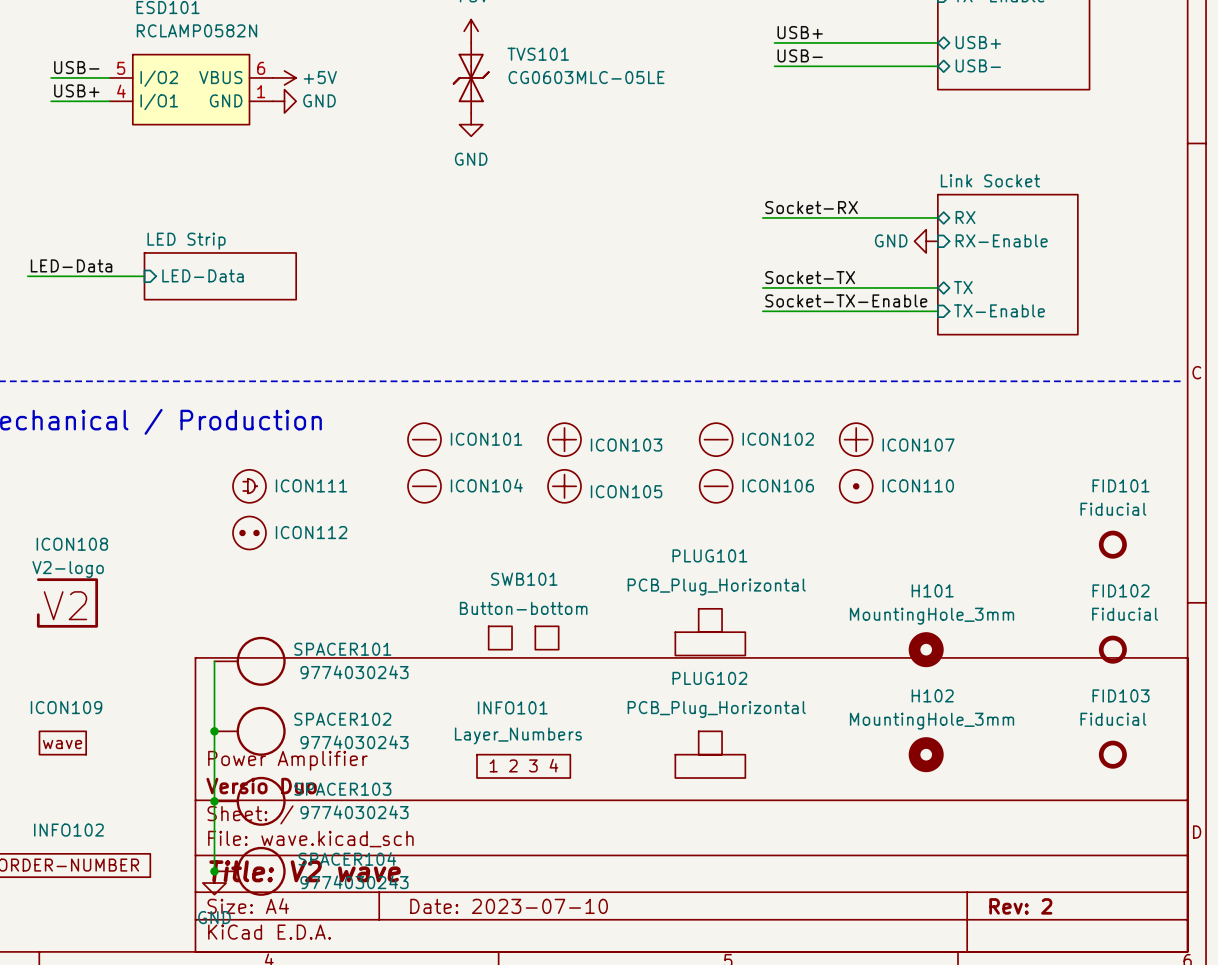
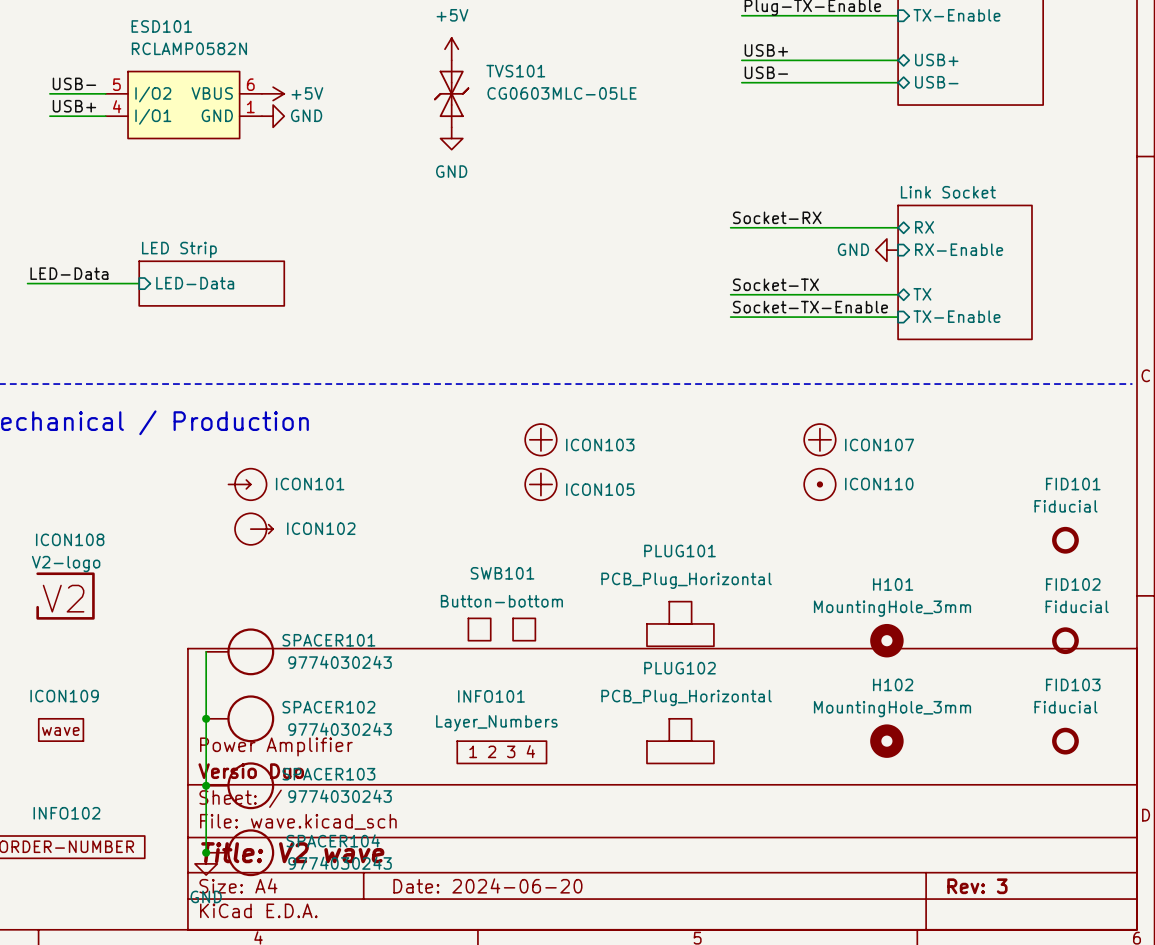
ICON101 symbol: [408, 423, 442, 457] -> [228, 468, 267, 501]
ICON102 symbol: [699, 423, 733, 457] -> [235, 513, 274, 545]
ICON111: (249, 486) -> none
ICON104: (424, 486) -> none
ICON106: (716, 486) -> none
ICON112: (249, 532) -> none
title block: Date: 2023-07-10 (509, 906) -> Date: 2024-06-20 (487, 885)
title block: Rev: 2 (1020, 906) -> Rev: 3 (977, 886)

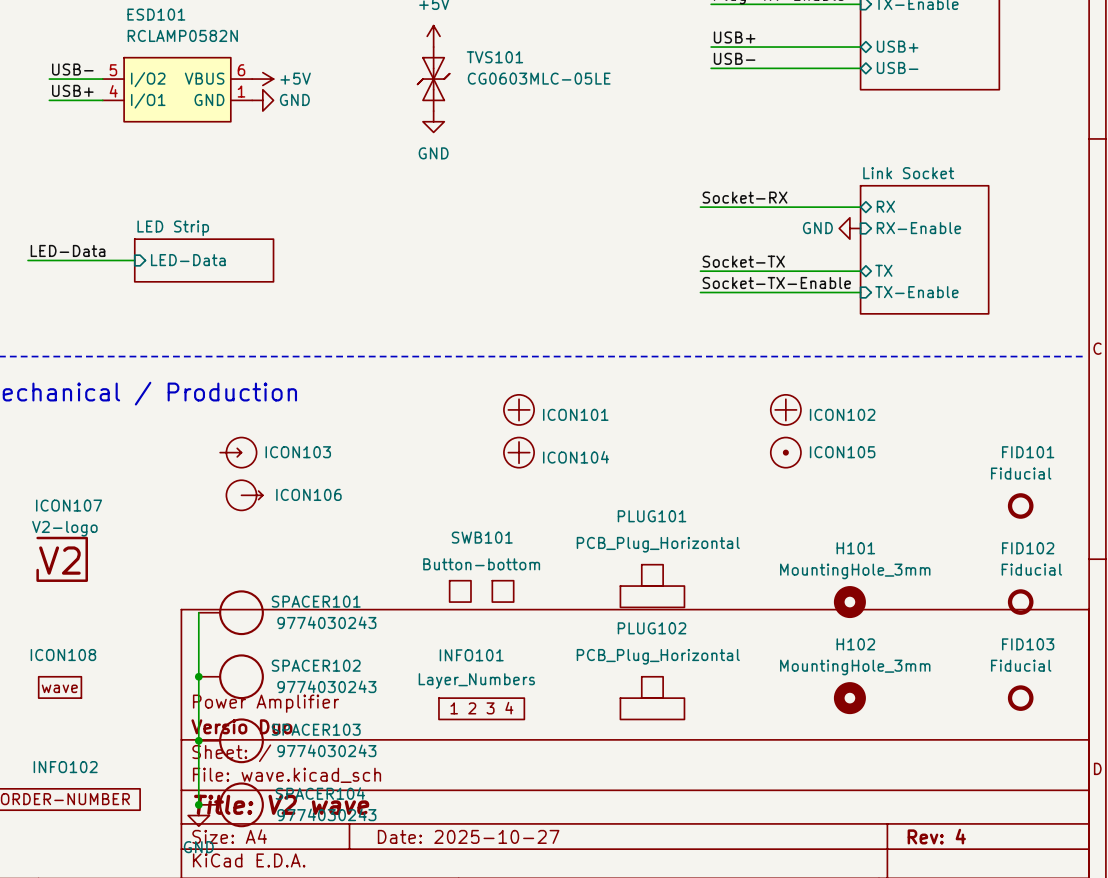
ICON103 name: ICON103 (600, 444) -> ICON101 (575, 414)
ICON107 name: ICON107 (879, 444) -> ICON102 (842, 414)
ICON101 name: ICON101 (310, 484) -> ICON103 (298, 452)
ICON110 name: ICON110 (879, 484) -> ICON105 (842, 452)
ICON105 name: ICON105 (600, 489) -> ICON104 (576, 457)
ICON102 name: ICON102 (321, 528) -> ICON106 (308, 494)
ICON107: none -> V2-logo (62, 559)
ICON108: V2-logo (65, 596) -> none
ICON109 name: ICON109 (64, 696) -> ICON108 (63, 655)
title block: Date: 2024-06-20 (487, 885) -> Date: 2025-10-27 (468, 836)
title block: Rev: 3 (977, 886) -> Rev: 4 (936, 836)

